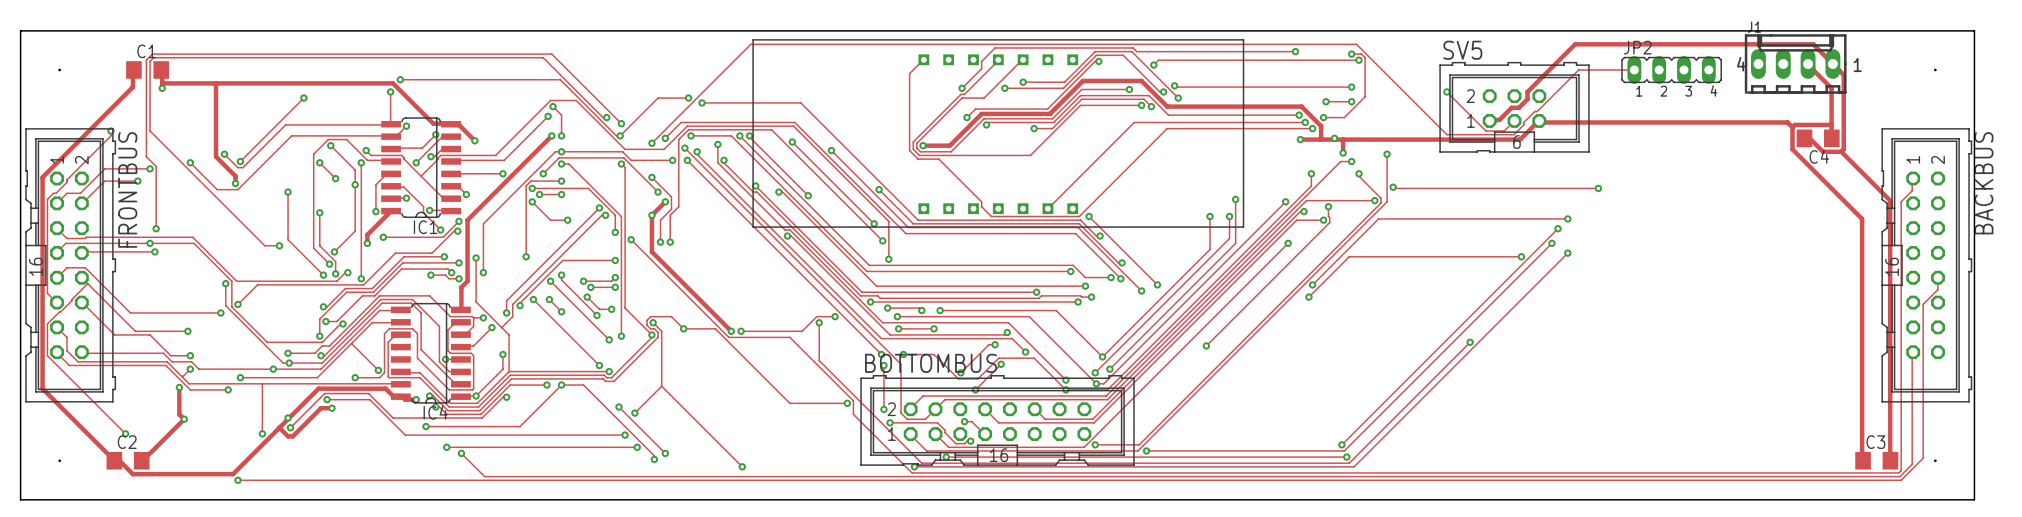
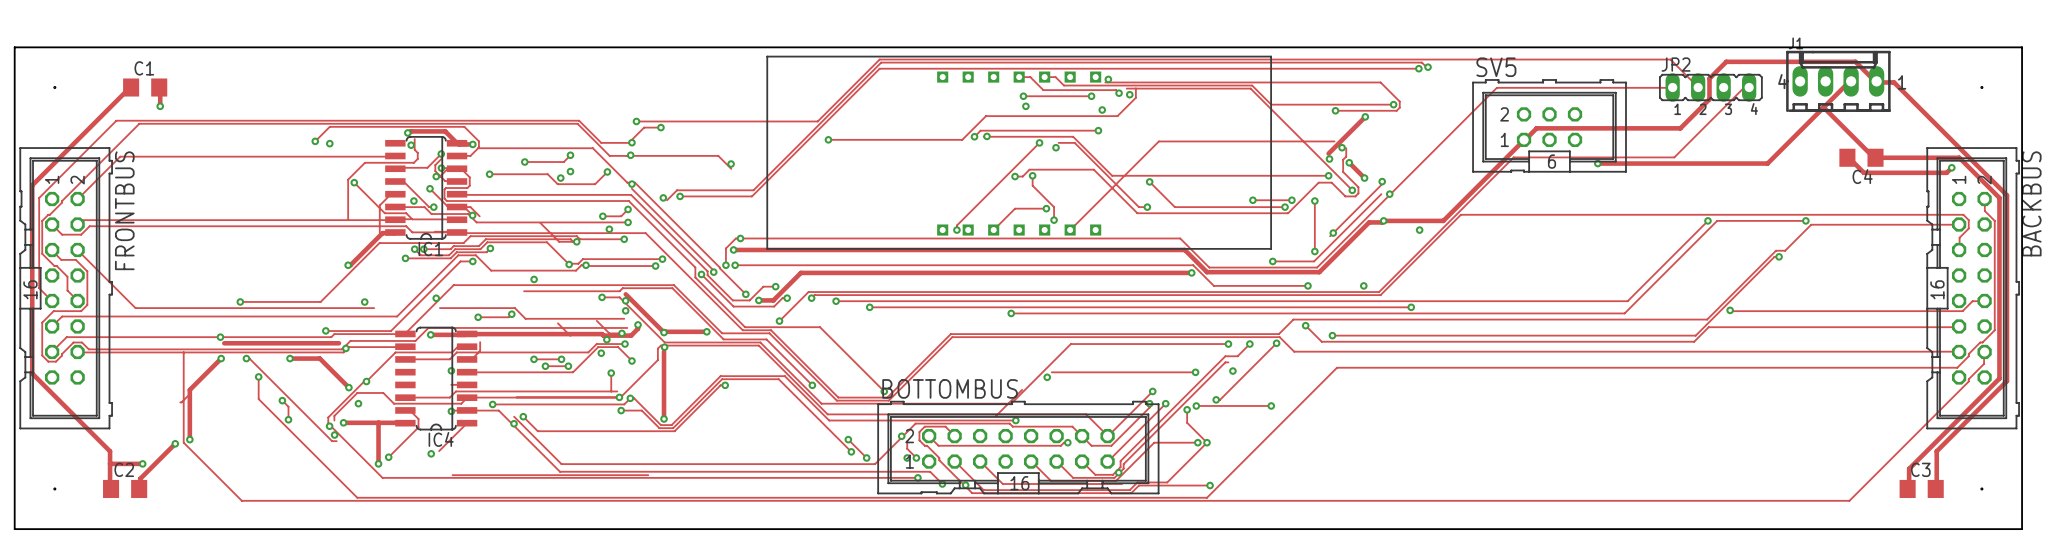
track: none -> (1428, 67) (1421, 62) (881, 62) (753, 190) (677, 190) (667, 200)
via: none -> (1428, 67)
track: (1295, 51) (1136, 51) (1133, 47) (995, 47) (981, 61) (981, 68) (962, 88) -> none
via: (1295, 51) -> none
track: none -> (1418, 68) (879, 68) (751, 196) (680, 196)
via: none -> (1418, 68)
track: (1351, 54) (1361, 54) (1365, 57) (1365, 96) (1344, 117) (1323, 117) -> none
via: (1351, 54) -> none
track: (923, 59) (909, 73) (909, 150) (918, 159) (938, 159) (981, 201) (981, 206) (991, 216) (1079, 216) (1167, 128) (1312, 128) -> none
track: (998, 59) (913, 142) (913, 149) (919, 155) (1030, 155) (1080, 105) (1141, 105) -> none
track: none -> (1019, 77) (1030, 77) (1043, 90) (1116, 90) (1119, 93)
track: (1023, 59) (984, 98) (962, 98) (916, 143) (916, 148) (920, 151) (951, 151) (984, 118) (1052, 118) (1081, 89) (1129, 89) -> (1044, 77) (1055, 77) (1064, 85) (1252, 85) (1271, 104) (1393, 104)
track: (1358, 60) (1158, 60) (1153, 65) -> none
via: (1358, 60) -> none
track: (1098, 61) (1095, 61) (1047, 109) (975, 109) (966, 117) -> none
via: (1098, 61) -> none
via: none -> (1108, 79)
track: (1808, 64) (1831, 88) (1831, 138) -> (1823, 107) (1875, 157)
track: none -> (1851, 81) (1767, 163) (1597, 163)
track: none -> (1105, 82) (1380, 82) (1399, 101) (1399, 107) (1396, 110) (1335, 110)
via: (1153, 65) -> none
track: (132, 69) (132, 87) (42, 177) (42, 388) (114, 460) (119, 460) (132, 474) (233, 474) (318, 388) (385, 388) (393, 396) (400, 396) (405, 399) (416, 399) -> (130, 87) (32, 185) (32, 373) (110, 451) (111, 488)
track: (1634, 69) (1578, 69) (1537, 111) (1534, 111) (1514, 134) (1446, 134) (1356, 44) (750, 44) (651, 143) -> (1672, 87) (1496, 87) (1317, 267) (1209, 267) (1180, 238) (735, 238) (725, 248) (725, 265)
track: none -> (1698, 87) (1670, 59) (879, 59) (817, 121) (636, 121)
track: none -> (1749, 87) (1743, 87) (1674, 157) (1513, 157) (1379, 292) (808, 292) (779, 321)
track: none -> (1126, 88) (1250, 88) (1352, 190)
track: none -> (1135, 88) (1135, 97) (1117, 116) (985, 116) (962, 139) (828, 139)
via: none -> (1119, 93)
via: none -> (1129, 94)
track: none -> (1023, 96) (1091, 96)
via: none -> (1023, 96)
via: none -> (1091, 96)
track: (400, 79) (560, 79) (616, 135) (620, 135) (658, 98) (688, 98) -> none
via: (400, 79) -> none
track: (1023, 82) (1064, 82) (1095, 51) (1131, 51) (1178, 98) -> none
via: (1023, 82) -> none
track: (162, 83) (393, 83) (433, 123) (458, 124) (474, 140) -> none
track: (215, 83) (215, 156) (235, 176) (235, 183) -> none
track: (1174, 85) (1351, 87) -> none
via: (1174, 85) -> none
via: none -> (1393, 104)
via: (1351, 87) -> none
via: (962, 88) -> none
track: (1004, 88) (1063, 88) (1096, 55) (1123, 55) (1159, 91) (1163, 91) -> none
via: (1129, 89) -> none
track: (390, 91) (390, 124) (285, 124) (242, 167) (237, 167) (224, 154) -> none
via: (390, 91) -> none
via: none -> (1102, 110)
via: (1163, 91) -> none
track: (1446, 91) (1485, 131) (1504, 131) (1514, 120) -> none
via: (1446, 91) -> none
via: none -> (1335, 110)
track: (303, 98) (240, 161) -> none
via: (303, 98) -> none
via: (688, 98) -> none
via: (1178, 98) -> none
track: none -> (1365, 116) (1328, 153)
via: none -> (1365, 116)
track: (1326, 101) (1351, 101) -> none
via: (1326, 101) -> none
via: (1351, 101) -> none
track: (702, 102) (800, 102) (918, 220) (1080, 220) (1096, 236) (1100, 236) -> none
via: (702, 102) -> none
via: none -> (636, 121)
via: (1141, 105) -> none
track: (553, 106) (561, 115) (561, 135) -> none
via: (553, 106) -> none
track: (1151, 106) (1144, 99) (1081, 99) (1052, 128) (1034, 128) -> none
via: (1151, 106) -> none
via: none -> (660, 127)
track: none -> (1098, 130) (980, 130) (974, 136)
via: none -> (1098, 130)
track: none -> (407, 132) (445, 131) (459, 144) (472, 144)
via: none -> (407, 132)
track: (1299, 115) (1168, 115) (1148, 95) (1080, 95) (1053, 122) (988, 122) (986, 124) -> none
via: (1299, 115) -> none
track: (548, 116) (504, 160) (451, 161) -> (441, 158) (435, 165) (435, 171) (445, 181) (457, 181)
via: (548, 116) -> none
track: (606, 117) (603, 117) (543, 57) (153, 57) (150, 61) (150, 131) (264, 245) (279, 245) -> none
via: (606, 117) -> none
via: none -> (974, 136)
track: none -> (983, 136) (1073, 136) (1112, 175) (1328, 175)
via: (1323, 117) -> none
track: none -> (414, 139) (414, 149) (417, 152) (417, 158) (413, 162) (364, 162) (348, 179) (348, 220)
via: none -> (828, 139)
track: (1489, 120) (1499, 120) (1511, 107) (1518, 107) (1527, 99) (1527, 91) (1575, 44) (1813, 44) (1843, 74) (1843, 149) (1841, 151) -> none
via: none -> (315, 141)
via: (1305, 122) -> none
track: (621, 123) (551, 54) (152, 54) (146, 60) (146, 156) (156, 166) (156, 228) -> none
track: none -> (1039, 142) (956, 225) (956, 230)
via: none -> (1039, 142)
track: none -> (1058, 142) (1074, 142) (1138, 207) (1147, 207)
via: none -> (329, 143)
via: (986, 124) -> none
track: (1831, 124) (1794, 124) (1792, 127) -> none
via: none -> (472, 144)
track: (406, 126) (396, 135) (391, 136) (291, 135) (237, 189) (217, 189) (190, 162) -> none
track: (1792, 127) (1792, 149) (1862, 218) (1863, 460) -> (1875, 157) (1959, 157) (1999, 197) (1999, 378) (1909, 468) (1909, 488) (1907, 488)
track: (1792, 127) (1787, 122) (1540, 122) (1539, 120) (1520, 139) (1300, 139) -> none
track: none -> (478, 147) (592, 148) (627, 182) (634, 182) (745, 294)
track: none -> (1346, 148) (1346, 156) (1343, 159) (1343, 171) (1358, 187) (1358, 193) (1355, 196) (1345, 196) (1331, 182) (1318, 182) (1288, 213) (1137, 213) (1093, 169) (1029, 169) (1022, 176) (1015, 176)
track: (110, 131) (110, 135) (66, 179) (66, 182) (47, 199) (47, 293) (57, 302) -> (655, 266) (581, 265) (576, 270) (491, 270) (475, 255) (458, 255) (397, 316) (62, 316) (52, 326)
via: (110, 131) -> none
track: (551, 135) (467, 220) (467, 281) (461, 287) (460, 309) -> none
via: (551, 135) -> none
track: (691, 135) (731, 135) (866, 271) (1070, 271) -> none
via: (691, 135) -> none
track: (739, 135) (869, 265) (1073, 265) (1085, 277) (1111, 277) -> none
via: (739, 135) -> none
track: (749, 135) (808, 195) -> none
via: (749, 135) -> none
track: none -> (395, 156) (120, 156) (77, 199)
track: (451, 136) (441, 137) (416, 162) -> (457, 156) (470, 155) (478, 147) (478, 141) (464, 126) (329, 126) (315, 141)
track: none -> (569, 155) (563, 162) (524, 162)
track: (665, 138) (681, 122) (794, 122) (905, 233) (1075, 233) (1120, 278) -> none
via: (665, 138) -> none
via: (1334, 138) -> none
track: (1805, 138) (1809, 138) (1823, 151) (1841, 151) -> (1848, 157) (1863, 172) (1946, 172) (1951, 167)
track: (1321, 139) (1321, 126) (1301, 106) (1167, 106) (1141, 80) (1083, 80) (1050, 113) (981, 113) (949, 145) (923, 145) -> none
track: (1343, 139) (1343, 153) -> none
via: (474, 140) -> none
via: none -> (524, 162)
track: (792, 142) (874, 223) -> none
via: (792, 142) -> none
via: (651, 143) -> none
track: none -> (1349, 162) (1364, 178)
via: none -> (1349, 162)
via: none -> (1597, 163)
track: (717, 144) (717, 162) (785, 229) (789, 229) (882, 322) (1008, 322) (1065, 380) -> none
track: (330, 145) (355, 170) (355, 231) (334, 251) -> none
via: (330, 145) -> none
via: (923, 145) -> none
track: none -> (441, 168) (461, 168) (469, 177) (469, 185) (467, 188) (444, 189) (444, 198) (446, 201) (628, 201) (695, 267) (695, 277) (745, 327) (820, 327) (884, 391)
via: none -> (441, 168)
track: (684, 148) (901, 364) (901, 413) (907, 419) (925, 419) (945, 399) (1107, 399) (1306, 200) (1374, 200) -> none
via: (684, 148) -> none
via: none -> (1951, 167)
track: (366, 150) (371, 155) (401, 155) (443, 198) (451, 198) -> (354, 182) (384, 213) (406, 213) (412, 219) (457, 219)
via: (366, 150) -> none
track: (831, 150) (908, 227) (1078, 227) (1141, 291) -> none
via: (831, 150) -> none
track: (697, 151) (697, 154) (881, 338) (1012, 338) (1025, 352) -> none
via: (697, 151) -> none
track: (1841, 151) (1890, 200) (1890, 460) -> (733, 249) (1184, 249) (1207, 272) (1319, 272) (1369, 222) (1443, 220) (1536, 128) (1680, 128) (1709, 99) (1709, 78) (1726, 61) (1855, 61) (1874, 80) (1894, 82) (2006, 195) (2006, 381) (1936, 451) (1935, 488)
track: none -> (607, 171) (595, 184) (557, 184) (547, 174) (489, 174)
via: none -> (607, 171)
via: (1343, 153) -> none
via: (224, 154) -> none
via: none -> (489, 174)
track: (1387, 154) (1387, 201) (1137, 450) (926, 450) (910, 434) -> none
via: (1387, 154) -> none
track: none -> (1032, 175) (1032, 185) (1054, 207) (1054, 220)
via: none -> (1032, 175)
via: none -> (1328, 175)
via: none -> (1015, 176)
via: none -> (560, 178)
via: none -> (1364, 178)
track: (672, 160) (631, 160) (622, 151) (555, 151) (483, 223) (483, 272) -> none
via: (672, 160) -> none
track: (687, 160) (881, 354) -> none
via: (687, 160) -> none
track: (723, 160) (723, 162) (753, 192) (756, 192) (860, 295) (877, 295) (880, 298) (1039, 298) (1041, 295) (1091, 297) -> none
via: (723, 160) -> none
via: (240, 161) -> none
track: (391, 161) (367, 160) (346, 139) (328, 139) (313, 154) (313, 248) (329, 264) -> (395, 181) (403, 181) (429, 207) (433, 207)
track: none -> (1149, 181) (1174, 207) (1285, 207)
via: none -> (1149, 181)
track: (1351, 161) (1340, 161) (1106, 396) (923, 396) (910, 409) -> (1067, 442) (1064, 442) (1060, 445) (938, 445) (929, 436)
track: none -> (1384, 181) (1330, 236)
via: (190, 162) -> none
track: (319, 162) (335, 178) -> none
via: (319, 162) -> none
via: none -> (354, 182)
track: (361, 162) (361, 278) -> none
via: (361, 162) -> none
via: (416, 162) -> none
track: (561, 164) (568, 164) (621, 216) (621, 336) -> none
via: (561, 164) -> none
track: (621, 164) (625, 167) (625, 308) (651, 334) (651, 337) (611, 377) (606, 377) (604, 375) (510, 375) (478, 407) (449, 407) (419, 377) -> (1152, 391) (1107, 436) (1086, 414) (827, 414) (758, 345) (660, 345) (657, 348) (657, 360) (620, 397) (467, 397) (461, 403) (424, 403)
track: (150, 168) (104, 168) (80, 193) (66, 193) (57, 203) -> (1959, 224) (1811, 224) (1785, 250) (1776, 250) (1707, 319) (1293, 319) (1278, 334) (950, 334) (887, 397) (838, 397) (771, 330) (742, 330) (645, 233) (412, 232) (406, 226) (89, 226) (81, 234) (62, 234) (52, 224)
via: (150, 168) -> none
track: none -> (429, 188) (447, 206) (470, 207) (479, 216)
via: none -> (429, 188)
track: none -> (631, 188) (713, 272)
via: none -> (1352, 190)
track: (502, 173) (451, 173) -> (775, 286) (763, 286) (749, 300) (732, 300) (707, 275) (707, 271) (631, 194) (457, 194)
via: (502, 173) -> none
track: (543, 173) (559, 157) (623, 157) (658, 192) -> none
via: (543, 173) -> none
track: (1311, 173) (1311, 185) (1107, 389) (1065, 389) (1034, 358) (998, 358) (977, 378) (958, 378) (934, 354) (903, 354) -> none
via: (1311, 173) -> none
track: none -> (1381, 194) (1314, 261) (1272, 261)
track: (1358, 173) (1358, 176) (1380, 198) (1380, 203) (1139, 444) (1095, 444) -> none
via: none -> (680, 196)
track: (421, 176) (440, 155) (495, 155) (550, 100) (576, 100) (625, 149) (664, 149) (687, 126) (793, 126) (888, 221) (888, 259) -> none
track: (651, 177) (671, 196) (671, 209) (660, 220) (660, 242) -> none
via: (335, 178) -> none
track: (1913, 178) (1912, 190) (1901, 201) (1901, 470) (1898, 472) (912, 472) (853, 414) (853, 400) (789, 337) (728, 337) (631, 239) -> none
track: none -> (1984, 199) (1984, 210) (1994, 220) (1994, 330) (1980, 342) (1957, 367) (1337, 367) (1207, 497) (357, 497) (258, 399) (258, 376)
track: none -> (1252, 200) (1291, 200)
via: none -> (1252, 200)
via: none -> (1291, 200)
via: none -> (413, 201)
track: none -> (1314, 201) (1314, 251)
via: none -> (1314, 201)
track: (137, 181) (104, 181) (81, 203) -> (395, 219) (82, 220) (77, 224)
via: (137, 181) -> none
track: (561, 181) (531, 181) (526, 185) (526, 256) -> none
via: (561, 181) -> none
via: (235, 183) -> none
via: (355, 184) -> none
track: (755, 185) (861, 292) (1036, 292) -> none
via: (755, 185) -> none
track: (391, 186) (404, 187) (423, 206) (423, 212) (440, 229) -> (395, 206) (424, 207) (431, 214) (468, 214) (476, 222) (628, 222)
via: none -> (433, 207)
via: none -> (1147, 207)
via: none -> (1285, 207)
track: none -> (1046, 208) (1015, 208) (993, 230)
via: none -> (1046, 208)
track: (1393, 187) (1598, 188) -> none
via: (1393, 187) -> none
track: (532, 188) (588, 188) (615, 215) (615, 232) -> none
via: (532, 188) -> none
track: none -> (628, 209) (621, 216) (602, 216)
via: none -> (628, 209)
via: (1598, 188) -> none
track: (879, 189) (913, 223) (1079, 223) (1118, 262) (1122, 262) -> none
via: (879, 189) -> none
track: (288, 192) (288, 239) (323, 275) -> none
via: (288, 192) -> none
via: (658, 192) -> none
track: (778, 192) (782, 192) (876, 286) (1085, 286) -> none
via: (778, 192) -> none
track: (539, 194) (561, 194) -> none
via: (539, 194) -> none
via: (561, 194) -> none
via: none -> (602, 216)
via: (808, 195) -> none
via: (406, 198) -> none
via: none -> (1054, 220)
track: (1235, 199) (1235, 243) (1109, 369) -> none
via: (1235, 199) -> none
via: none -> (1383, 220)
track: none -> (1707, 220) (1627, 301) (836, 301)
via: none -> (1707, 220)
track: none -> (1805, 220) (1717, 220) (1624, 313) (1011, 313)
via: none -> (1805, 220)
via: (1374, 200) -> none
via: (532, 201) -> none
via: none -> (628, 222)
track: (665, 201) (651, 215) (651, 251) (731, 331) -> none
via: (665, 201) -> none
track: (1285, 201) (1103, 383) (1096, 383) (1029, 316) (897, 316) -> none
via: (1285, 201) -> none
track: (1328, 206) (1329, 222) (1206, 345) -> none
via: (1328, 206) -> none
track: (599, 207) (506, 300) (506, 312) -> none
via: none -> (956, 230)
via: none -> (1419, 230)
via: (429, 210) -> none
via: (375, 211) -> none
track: (391, 211) (367, 234) (367, 243) -> (395, 232) (382, 233) (350, 265) (348, 265)
track: (1304, 211) (1300, 211) (1092, 419) (1045, 419) (1034, 409) -> none
track: (319, 212) (319, 245) (335, 261) (335, 273) -> none
via: (319, 212) -> none
track: (605, 215) (601, 215) (512, 304) (512, 316) (501, 327) -> none
via: (605, 215) -> none
via: (651, 215) -> none
via: none -> (740, 238)
track: (1089, 216) (1157, 284) -> none
via: (1089, 216) -> none
track: (1210, 216) (1210, 249) (1102, 356) (1056, 310) (940, 310) -> none
via: (1210, 216) -> none
track: (1229, 216) (1229, 238) (1095, 372) -> none
via: (1229, 216) -> none
track: none -> (624, 239) (579, 239) (576, 236) (470, 236) (463, 243) (379, 243) (320, 301) (240, 301)
via: none -> (624, 239)
track: (1567, 218) (1378, 218) (1312, 284) -> none
via: (1567, 218) -> none
track: none -> (573, 242) (570, 239) (485, 239) (478, 246) (423, 249)
track: (1323, 220) (1296, 220) (1093, 422) (998, 422) (985, 409) -> none
via: (1323, 220) -> none
track: (458, 221) (443, 237) (383, 237) -> none
via: (458, 221) -> none
via: (874, 223) -> none
track: none -> (490, 248) (486, 252) (456, 252) (450, 258) (405, 258)
via: none -> (490, 248)
track: none -> (414, 249) (420, 255) (449, 255) (455, 249) (480, 249) (487, 242) (547, 242) (569, 264) (578, 263) (582, 259) (662, 259)
via: none -> (414, 249)
via: none -> (423, 249)
track: (57, 228) (66, 238) (192, 237) (236, 281) (336, 281) (347, 272) -> (52, 249) (61, 259) (75, 259) (87, 271) (87, 305) (81, 311) (53, 311) (42, 322) (42, 355) (48, 361) (55, 361) (73, 342) (82, 342) (88, 349) (342, 349) (350, 340) (415, 340) (428, 327) (627, 327)
track: none -> (77, 249) (135, 308) (374, 308)
via: (156, 228) -> none
via: none -> (733, 249)
track: (1558, 228) (1341, 444) -> none
via: (1558, 228) -> none
track: none -> (1959, 249) (1959, 237) (1968, 228) (1968, 220) (1963, 214) (1460, 214) (1380, 295) (814, 295) (811, 298)
via: (440, 229) -> none
via: none -> (1314, 251)
track: (457, 231) (454, 231) (432, 253) (395, 253) (363, 284) (257, 284) (237, 304) -> none
via: (457, 231) -> none
via: (615, 232) -> none
track: none -> (1779, 256) (1774, 256) (1695, 335) (1332, 335)
via: none -> (1779, 256)
via: none -> (405, 258)
track: (787, 236) (791, 236) (890, 334) (1004, 334) (1007, 332) -> none
via: (787, 236) -> none
via: (1100, 236) -> none
via: (383, 237) -> none
via: none -> (662, 259)
track: none -> (472, 261) (460, 261) (390, 331) (328, 331)
via: none -> (472, 261)
via: (631, 239) -> none
via: none -> (1272, 261)
track: (882, 240) (771, 129) (688, 129) (678, 139) (678, 206) (670, 215) (670, 242) -> none
via: (882, 240) -> none
via: none -> (348, 265)
via: none -> (569, 264)
via: none -> (586, 265)
via: (660, 242) -> none
via: (670, 242) -> none
via: none -> (725, 265)
track: none -> (735, 265) (1193, 265) (1213, 285) (1307, 285)
via: none -> (735, 265)
via: (150, 243) -> none
via: (367, 243) -> none
via: none -> (655, 266)
track: (1288, 243) (1084, 447) (948, 447) (935, 434) -> (1187, 409) (1187, 422) (1207, 442) (1167, 482) (1137, 482) (1129, 490) (983, 490) (954, 461)
via: (1288, 243) -> none
track: (1551, 243) (1344, 450) (1146, 450) -> none
via: (1551, 243) -> none
via: (279, 245) -> none
via: none -> (713, 272)
track: none -> (1191, 272) (800, 272) (773, 300) (758, 300)
via: none -> (1191, 272)
track: (154, 251) (81, 252) -> none
via: (154, 251) -> none
via: (334, 251) -> none
track: none -> (701, 274) (733, 306) (774, 306) (782, 298) (787, 298)
via: none -> (701, 274)
track: (57, 252) (65, 243) (194, 243) (231, 281) (231, 306) (267, 342) (322, 342) (340, 323) (342, 323) -> none
track: (1567, 253) (1354, 466) (914, 466) -> none
via: (1567, 253) -> none
track: (444, 256) (404, 256) (372, 288) (345, 288) (327, 306) (323, 306) -> none
via: (444, 256) -> none
track: (1521, 256) (1349, 256) (1308, 297) -> none
via: (1521, 256) -> none
track: (476, 258) (476, 301) (509, 334) (509, 371) (477, 403) (450, 403) (419, 372) (400, 371) -> (617, 391) (455, 391) (449, 397) (405, 397)
via: (476, 258) -> none
via: (888, 259) -> none
track: (615, 260) (562, 260) (520, 303) (520, 305) -> none
via: (615, 260) -> none
track: (458, 262) (402, 262) (373, 292) (346, 292) (319, 319) (319, 336) -> none
via: (458, 262) -> none
via: (1122, 262) -> none
via: none -> (775, 286)
via: none -> (1307, 285)
via: none -> (1363, 285)
via: (329, 264) -> none
track: none -> (524, 291) (619, 291) (622, 288) (672, 288) (723, 339) (766, 339) (812, 385)
track: none -> (625, 294) (664, 332) (706, 331)
via: none -> (745, 294)
via: (1070, 271) -> none
via: (347, 272) -> none
track: (451, 272) (448, 269) (401, 269) (374, 295) (362, 295) (336, 321) (325, 321) -> none
via: (451, 272) -> none
via: (483, 272) -> none
via: (335, 273) -> none
track: none -> (602, 297) (619, 297) (664, 342) (760, 342) (821, 403) (1011, 403) (1070, 344) (1228, 344)
via: none -> (602, 297)
via: (323, 275) -> none
track: (430, 275) (445, 275) (449, 278) (458, 278) -> none
track: (561, 275) (561, 280) (596, 315) -> none
via: (561, 275) -> none
via: none -> (787, 298)
via: none -> (811, 298)
track: (57, 277) (66, 267) (85, 267) (130, 312) (220, 312) -> (52, 300) (39, 288) (39, 197) (116, 120) (579, 120) (601, 142) (628, 142) (644, 127) (660, 127)
track: (81, 277) (135, 331) (187, 331) -> (77, 300) (67, 290) (67, 276) (42, 253) (42, 220) (139, 123) (577, 123) (609, 155) (718, 155) (731, 168)
track: (615, 277) (611, 281) (583, 281) -> none
via: none -> (758, 300)
via: none -> (836, 301)
via: (1111, 277) -> none
track: (1938, 277) (1937, 289) (1923, 304) (1923, 458) (1901, 480) (237, 480) -> (1984, 300) (1972, 301) (1962, 311) (1730, 310)
via: none -> (240, 301)
via: (458, 278) -> none
via: (1120, 278) -> none
track: (550, 281) (609, 339) -> none
via: (550, 281) -> none
via: (583, 281) -> none
track: (87, 283) (47, 323) (47, 355) (125, 433) -> none
track: (225, 283) (225, 305) (283, 363) (322, 363) (382, 303) (411, 303) (421, 312) (421, 349) (455, 383) (460, 384) -> none
via: (225, 283) -> none
track: none -> (869, 307) (1411, 307)
via: none -> (869, 307)
via: none -> (1411, 307)
track: none -> (439, 308) (514, 308) (525, 318) (624, 318)
via: (1157, 284) -> none
via: (1312, 284) -> none
via: (1085, 286) -> none
via: none -> (1730, 310)
track: (590, 287) (615, 287) -> none
via: (590, 287) -> none
via: none -> (1011, 313)
track: none -> (511, 314) (508, 317) (478, 317)
via: none -> (511, 314)
via: (1141, 291) -> none
via: (1036, 292) -> none
via: none -> (478, 317)
via: (587, 297) -> none
via: none -> (779, 321)
via: (1091, 297) -> none
via: (1308, 297) -> none
track: (533, 299) (599, 365) -> none
via: (533, 299) -> none
via: (549, 299) -> none
track: none -> (638, 324) (638, 328) (631, 335) (430, 334)
via: none -> (638, 324)
track: (870, 301) (1078, 301) -> none
via: (870, 301) -> none
via: (1078, 301) -> none
track: none -> (1305, 325) (1321, 341) (1694, 341) (1708, 327) (1959, 326)
via: none -> (1305, 325)
track: (81, 302) (114, 334) (150, 334) (170, 355) (190, 355) -> none
via: (237, 304) -> none
via: (520, 305) -> none
via: none -> (706, 331)
via: none -> (664, 332)
track: (887, 308) (919, 308) (921, 310) -> none
via: (887, 308) -> none
track: (400, 309) (379, 310) (321, 369) (198, 369) (191, 361) (172, 361) (163, 353) (81, 352) -> none
via: none -> (430, 334)
via: (921, 310) -> none
via: (940, 310) -> none
via: (561, 311) -> none
via: none -> (1332, 335)
via: (506, 312) -> none
track: (835, 316) (816, 316) (802, 331) (741, 331) -> none
via: (835, 316) -> none
via: (897, 316) -> none
track: (483, 317) (450, 316) (429, 295) (379, 295) (329, 345) (322, 345) (314, 353) (288, 353) -> none
via: (483, 317) -> none
track: none -> (224, 343) (338, 343)
track: none -> (1276, 343) (1220, 399) (1216, 399)
via: none -> (1276, 343)
track: none -> (625, 344) (596, 344) (588, 352) (456, 352) (449, 359) (405, 359)
via: none -> (625, 344)
via: none -> (1228, 344)
track: none -> (1249, 344) (1237, 356) (1225, 356) (1120, 461) (1120, 467) (1112, 474) (1095, 474) (1082, 461)
via: none -> (1249, 344)
via: (325, 321) -> none
track: (400, 322) (372, 322) (317, 377) (240, 377) -> (405, 346) (348, 347) (343, 352) (77, 351)
track: (460, 322) (455, 322) (448, 330) (448, 350) (450, 353) (471, 353) (473, 355) (472, 389) (449, 389) (417, 358) (417, 333) (412, 328) (389, 328) (384, 333) (384, 372) (379, 377) (355, 377) -> (467, 346) (457, 347) (452, 352) (395, 352) (328, 417) (328, 423) (382, 477) (917, 477)
track: (653, 322) (661, 331) (661, 386) -> none
track: (819, 322) (819, 360) (921, 463) (1349, 463) (1470, 342) -> none
via: (819, 322) -> none
track: (57, 327) (66, 337) (66, 350) (77, 361) (167, 361) (189, 383) (400, 384) -> (388, 457) (418, 427) (418, 418) (410, 410) (405, 410)
track: none -> (52, 351) (66, 337) (331, 337) (334, 334) (404, 334) (453, 285) (673, 285) (722, 333) (769, 333) (836, 400) (888, 400) (952, 337) (1279, 337) (1294, 351) (1959, 351)
track: (491, 327) (473, 345) (460, 347) -> (631, 360) (618, 347) (598, 347) (573, 372) (467, 372)
via: (491, 327) -> none
track: none -> (664, 351) (664, 418)
track: none -> (1984, 351) (1984, 363) (1968, 379) (1968, 381) (1849, 500) (241, 500) (183, 442) (183, 352)
via: none -> (601, 353)
via: (683, 328) -> none
track: (898, 328) (934, 328) -> none
via: (898, 328) -> none
via: (934, 328) -> none
via: (187, 331) -> none
via: (731, 331) -> none
via: (741, 331) -> none
via: (1007, 332) -> none
track: none -> (221, 358) (189, 389) (189, 439)
via: none -> (221, 358)
track: none -> (246, 358) (249, 358) (332, 441) (336, 441)
via: none -> (246, 358)
track: none -> (290, 358) (319, 358) (348, 387)
via: none -> (290, 358)
track: (400, 334) (395, 334) (388, 342) (388, 376) (389, 377) -> (334, 420) (334, 415) (357, 392) (383, 392) (394, 403)
track: none -> (533, 359) (561, 359)
via: none -> (533, 359)
via: none -> (561, 359)
via: (651, 334) -> none
via: (319, 336) -> none
track: none -> (1228, 362) (1225, 362) (1123, 464) (1123, 468) (1114, 477) (1073, 477) (1056, 461)
via: (609, 339) -> none
track: none -> (545, 366) (568, 366)
via: none -> (545, 366)
via: none -> (568, 366)
via: (1470, 342) -> none
track: (351, 343) (378, 370) -> none
track: (995, 344) (988, 344) (960, 372) -> none
via: (995, 344) -> none
via: none -> (451, 370)
track: none -> (611, 373) (611, 391)
via: none -> (611, 373)
track: none -> (1051, 372) (1195, 372)
via: none -> (1195, 372)
via: none -> (258, 376)
track: (57, 352) (69, 365) (165, 365) (190, 389) (228, 389) -> none
track: (1913, 352) (1912, 464) (1899, 476) (484, 476) (461, 453) -> none
via: (288, 353) -> none
track: (502, 354) (502, 369) (476, 396) (460, 396) -> (439, 451) (467, 423)
via: (502, 354) -> none
via: (881, 354) -> none
via: (903, 354) -> none
via: (190, 355) -> none
track: (321, 355) (324, 355) (380, 299) (412, 299) (439, 326) (439, 361) (449, 371) (460, 371) -> none
via: (321, 355) -> none
via: none -> (366, 381)
via: (1102, 356) -> none
via: (445, 359) -> none
track: none -> (725, 385) (720, 385) (674, 431) (537, 431) (523, 416)
via: none -> (725, 385)
via: none -> (812, 385)
via: none -> (348, 387)
via: (289, 363) -> none
via: (1001, 364) -> none
via: (599, 365) -> none
via: none -> (884, 391)
track: (883, 365) (883, 409) -> none
via: (883, 365) -> none
via: none -> (1152, 391)
via: (190, 369) -> none
via: (273, 369) -> none
via: (1109, 369) -> none
via: (378, 370) -> none
via: none -> (630, 398)
via: (960, 372) -> none
via: (1095, 372) -> none
track: none -> (282, 400) (288, 406) (288, 419)
via: none -> (282, 400)
via: none -> (1216, 399)
via: (240, 377) -> none
track: none -> (1149, 403) (1149, 407) (1111, 445) (1091, 445) (1072, 426) (1012, 426) (1009, 423) (915, 423) (875, 464) (561, 464) (514, 416)
via: none -> (1149, 403)
track: none -> (1165, 403) (1107, 461)
via: none -> (1165, 403)
track: none -> (492, 404) (624, 404) (630, 398) (634, 398) (660, 425) (671, 425) (720, 376) (784, 376) (829, 420) (1015, 420)
via: none -> (492, 404)
track: none -> (1196, 405) (1271, 405)
via: none -> (1196, 405)
via: none -> (1271, 405)
via: (1065, 380) -> none
track: (262, 383) (262, 433) -> none
via: (1096, 383) -> none
via: none -> (1187, 409)
track: none -> (621, 410) (641, 410) (659, 428) (673, 428) (722, 379) (778, 379) (851, 451)
via: none -> (621, 410)
track: none -> (451, 411) (498, 410) (560, 471) (930, 471) (942, 483)
via: none -> (451, 411)
track: (546, 385) (510, 385) (480, 414) (446, 414) (439, 407) (435, 407) -> none
via: (546, 385) -> none
via: (561, 385) -> none
track: (661, 386) (634, 413) -> none
track: (661, 386) (742, 466) -> none
track: (179, 387) (179, 414) (184, 419) (142, 460) -> (175, 443) (140, 478) (140, 488)
via: (179, 387) -> none
via: (228, 389) -> none
via: (975, 389) -> none
via: (1065, 389) -> none
via: none -> (523, 416)
via: none -> (664, 418)
via: none -> (288, 419)
via: none -> (1015, 420)
track: none -> (343, 422) (405, 423)
via: none -> (343, 422)
track: none -> (378, 422) (378, 463)
track: (429, 396) (433, 396) (448, 410) (479, 410) (511, 378) (603, 378) (605, 381) (614, 381) (658, 337) (658, 332) (647, 325) (647, 320) (650, 316) (671, 316) (683, 328) (715, 328) (789, 403) (847, 403) -> none
via: (429, 396) -> none
via: (476, 396) -> none
track: (506, 397) (502, 397) (482, 418) (393, 418) (368, 393) (324, 393) (290, 427) -> none
track: (327, 399) (369, 399) (405, 435) (625, 435) -> none
via: (416, 399) -> none
via: (847, 403) -> none
via: (435, 407) -> none
track: (618, 407) (665, 453) -> none
via: (618, 407) -> none
track: (331, 408) (321, 408) (292, 436) (288, 436) (279, 427) -> none
track: none -> (954, 436) (945, 426) (924, 426) (919, 431) (919, 440) (927, 445) (972, 493) (1131, 493) (1138, 485) (1210, 485)
via: none -> (189, 439)
track: none -> (848, 439) (866, 457)
via: none -> (848, 439)
via: (634, 413) -> none
track: none -> (907, 441) (907, 448) (916, 457)
via: none -> (1067, 442)
track: none -> (1197, 442) (1154, 442) (1116, 480) (1051, 480) (1031, 461)
via: none -> (1197, 442)
via: none -> (1207, 442)
via: none -> (175, 443)
via: (288, 418) -> none
via: (184, 419) -> none
track: (964, 421) (971, 421) (985, 434) -> none
via: (964, 421) -> none
track: (890, 422) (937, 422) (956, 443) (970, 441) -> none
via: (890, 422) -> none
via: none -> (851, 451)
track: (426, 426) (520, 426) (561, 385) (583, 385) (654, 455) (654, 459) -> none
via: (290, 427) -> none
via: none -> (388, 457)
via: none -> (866, 457)
via: none -> (907, 457)
via: none -> (916, 457)
via position: (125, 433) -> (142, 463)
via: (262, 433) -> none
track: none -> (980, 461) (1002, 483) (1122, 483)
via: (625, 435) -> none
track: none -> (110, 463) (142, 463)
via: none -> (378, 463)
via: (970, 441) -> none
via: (1341, 444) -> none
via: (446, 447) -> none
via: (637, 447) -> none
via: none -> (917, 477)
via: (1146, 450) -> none
via: (461, 453) -> none
via: (665, 453) -> none
via: none -> (942, 483)
track: (946, 457) (1346, 457) -> none
via: none -> (1210, 485)
via: (1346, 457) -> none
via: (654, 459) -> none
via: (742, 466) -> none
via: (914, 466) -> none
via: (237, 480) -> none

